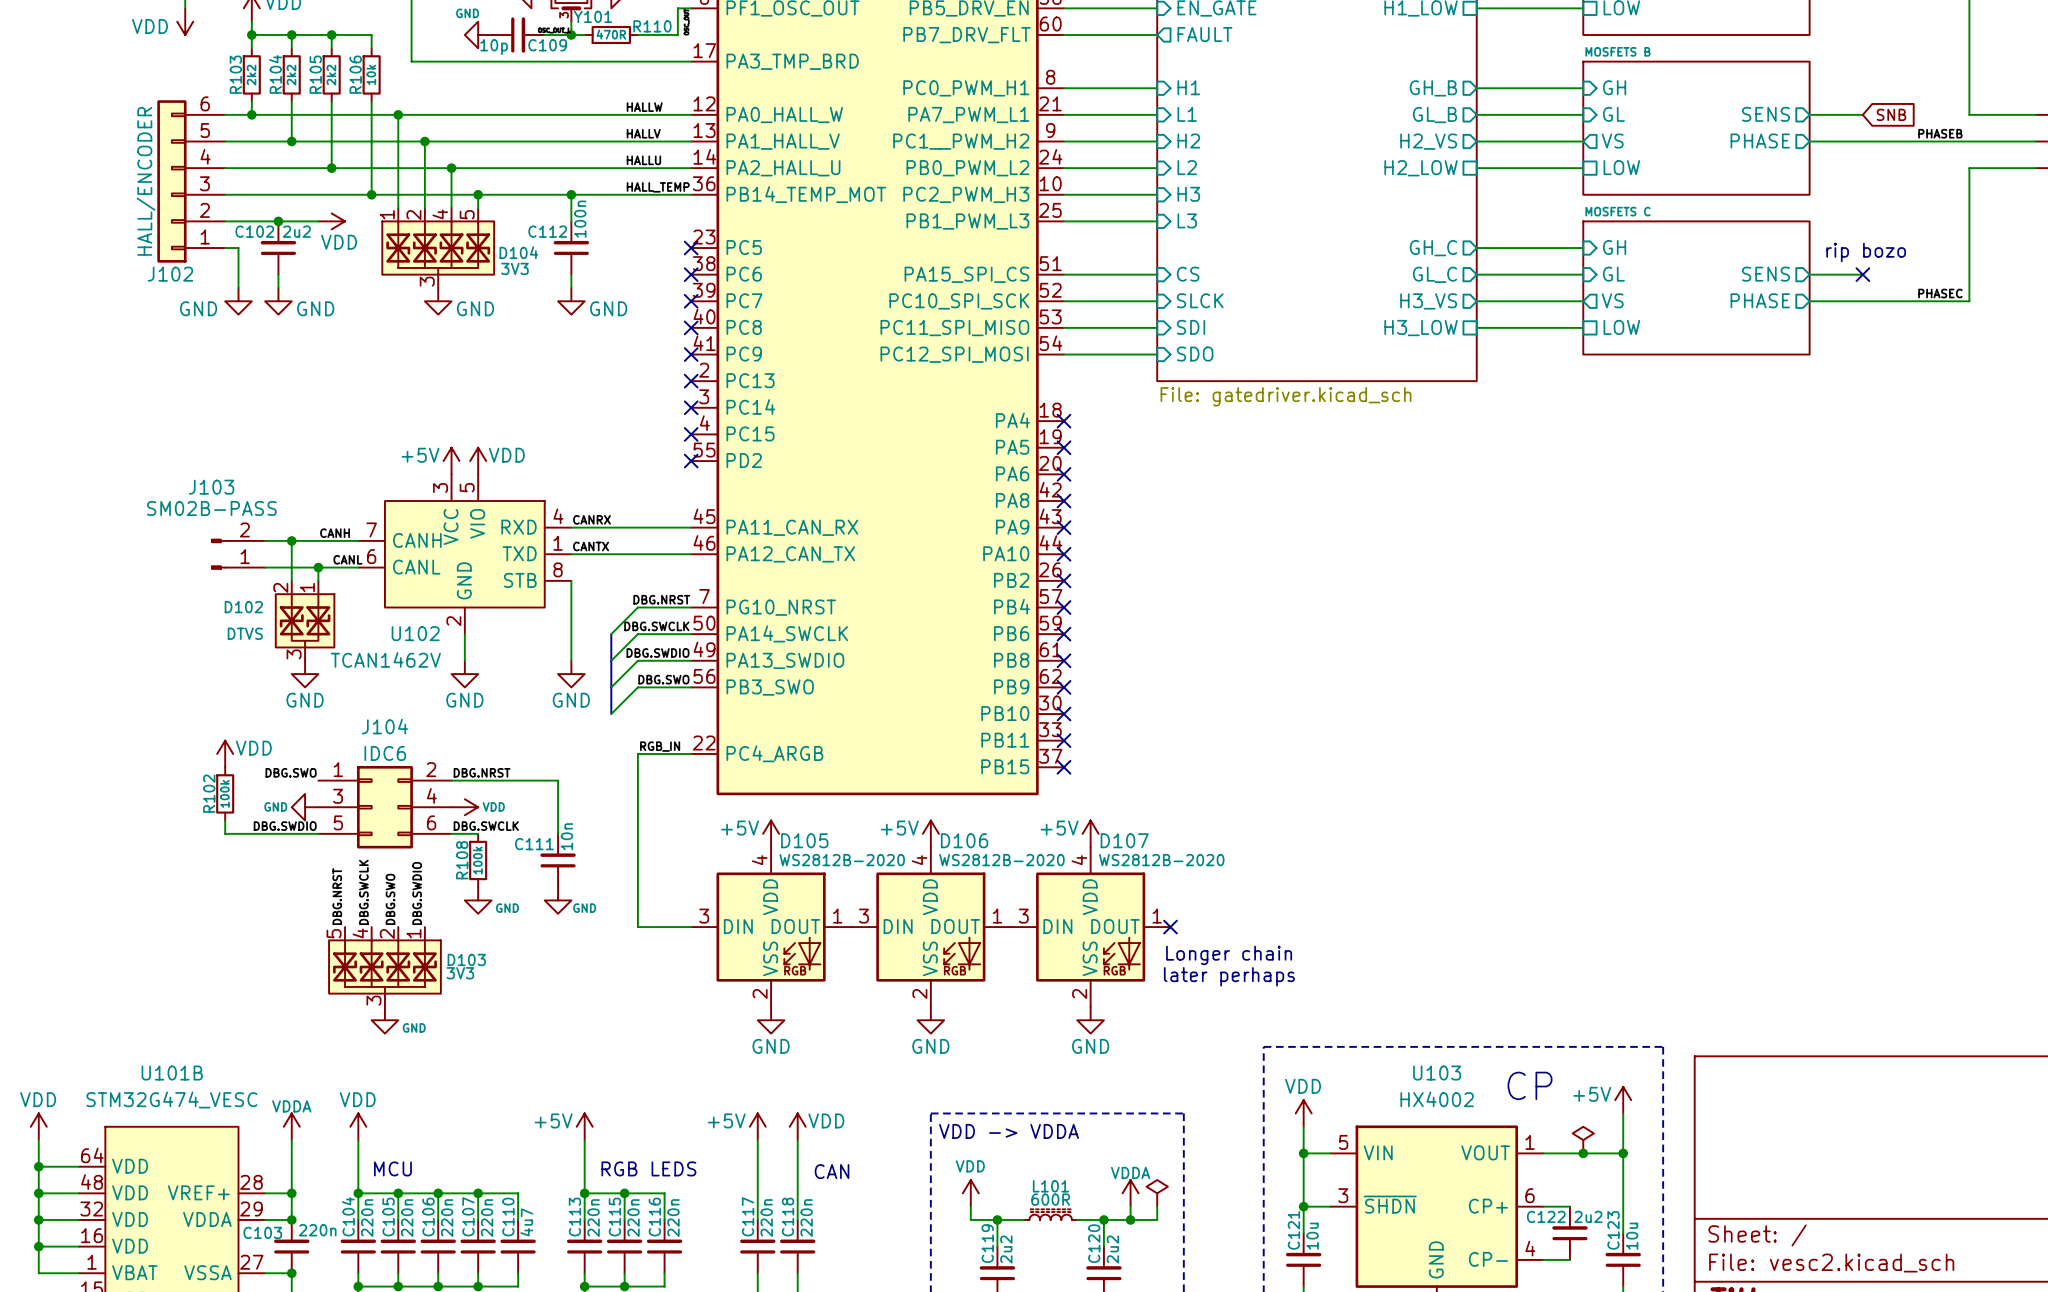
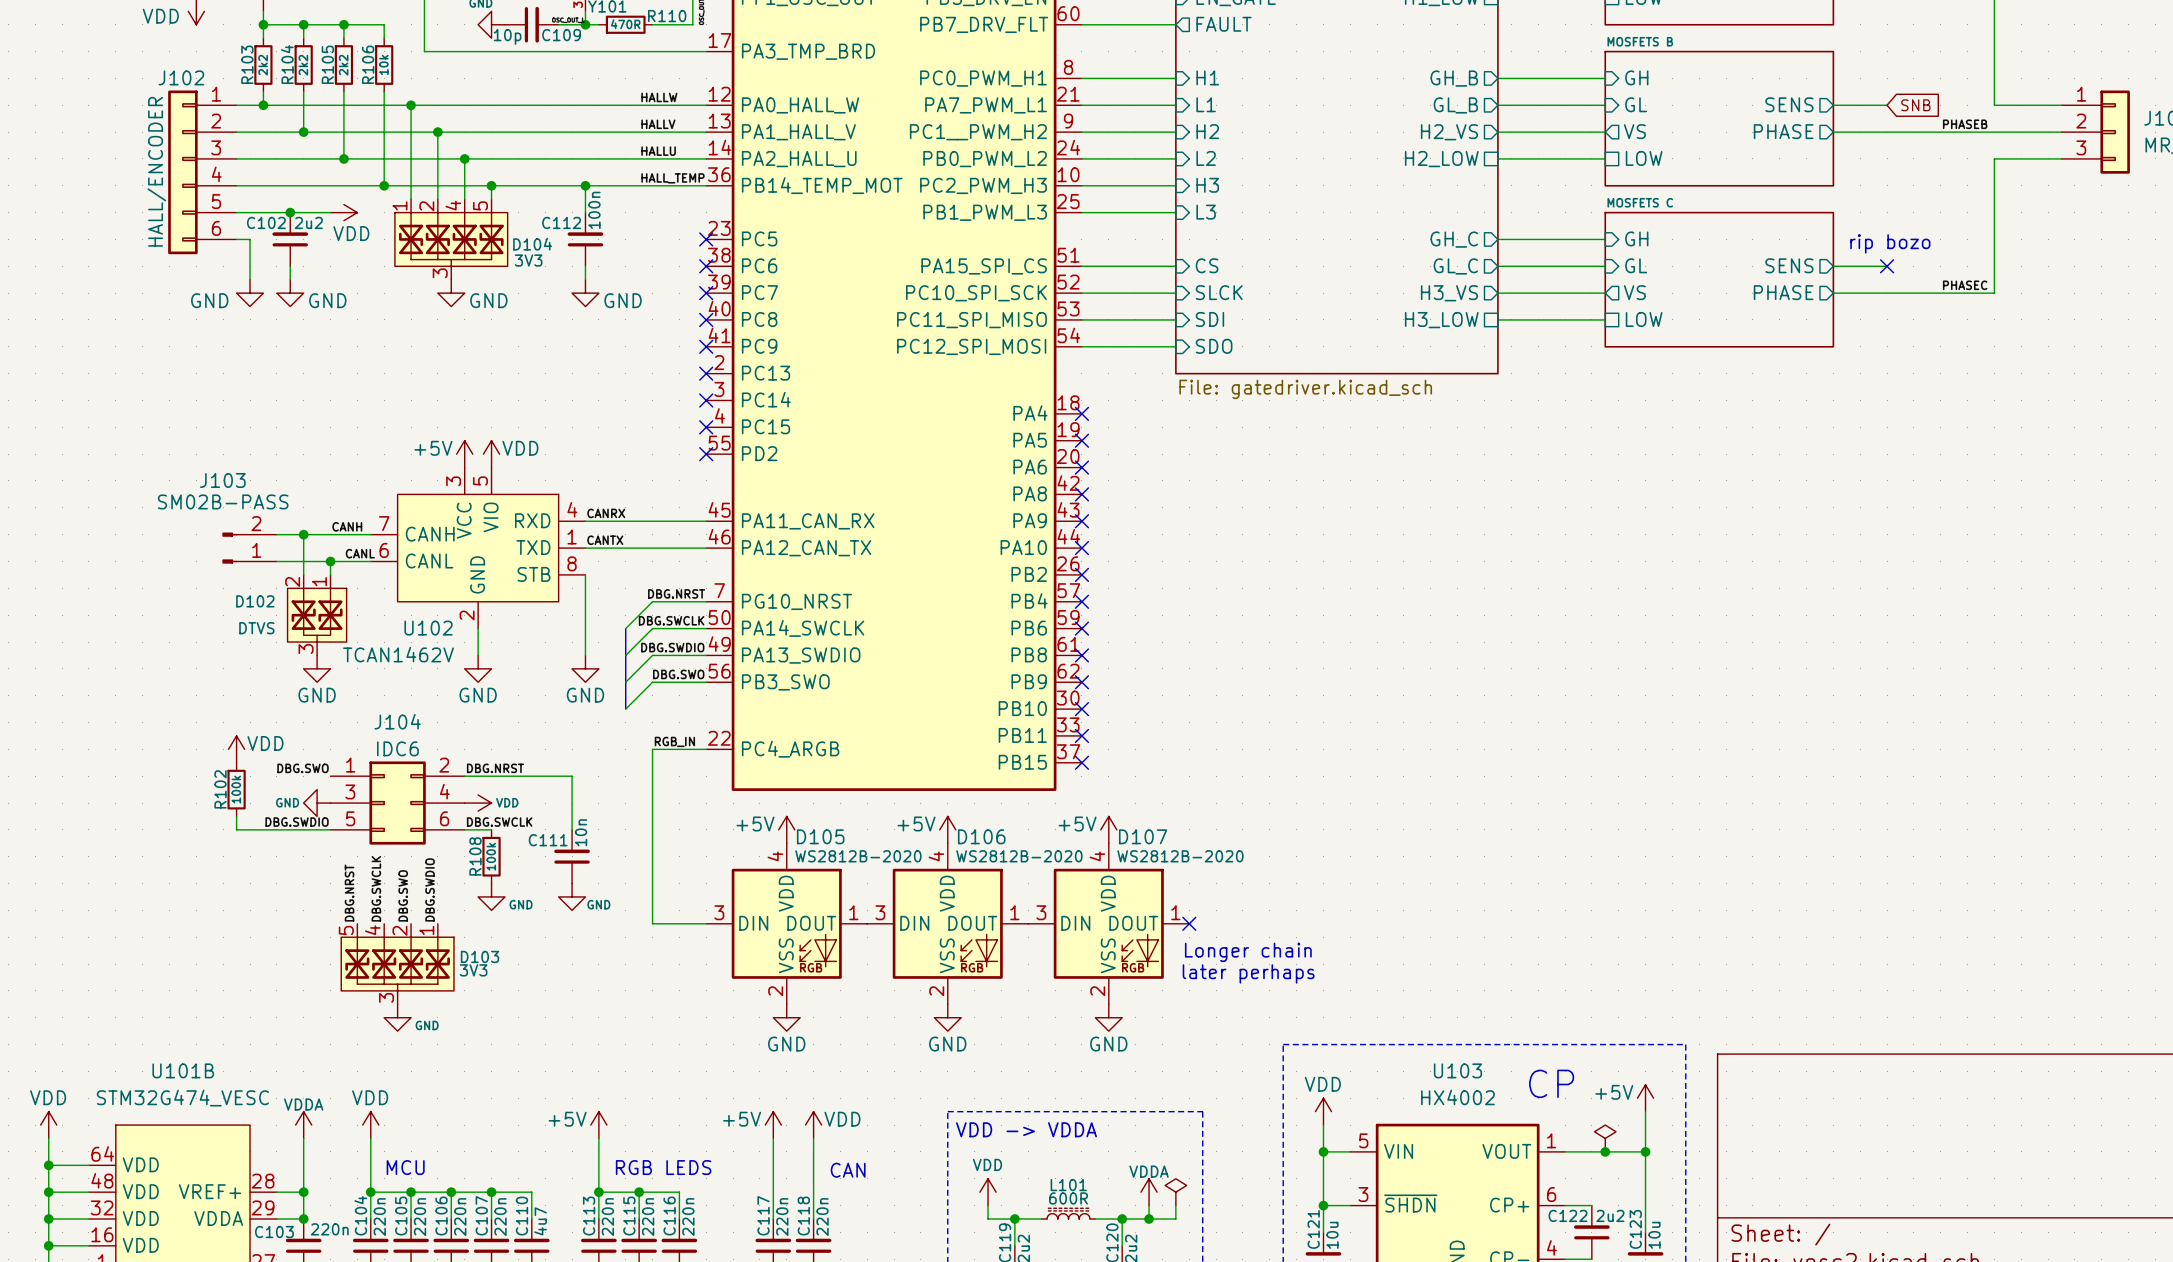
J102 flip: as is (171, 181) -> up-down (182, 172)

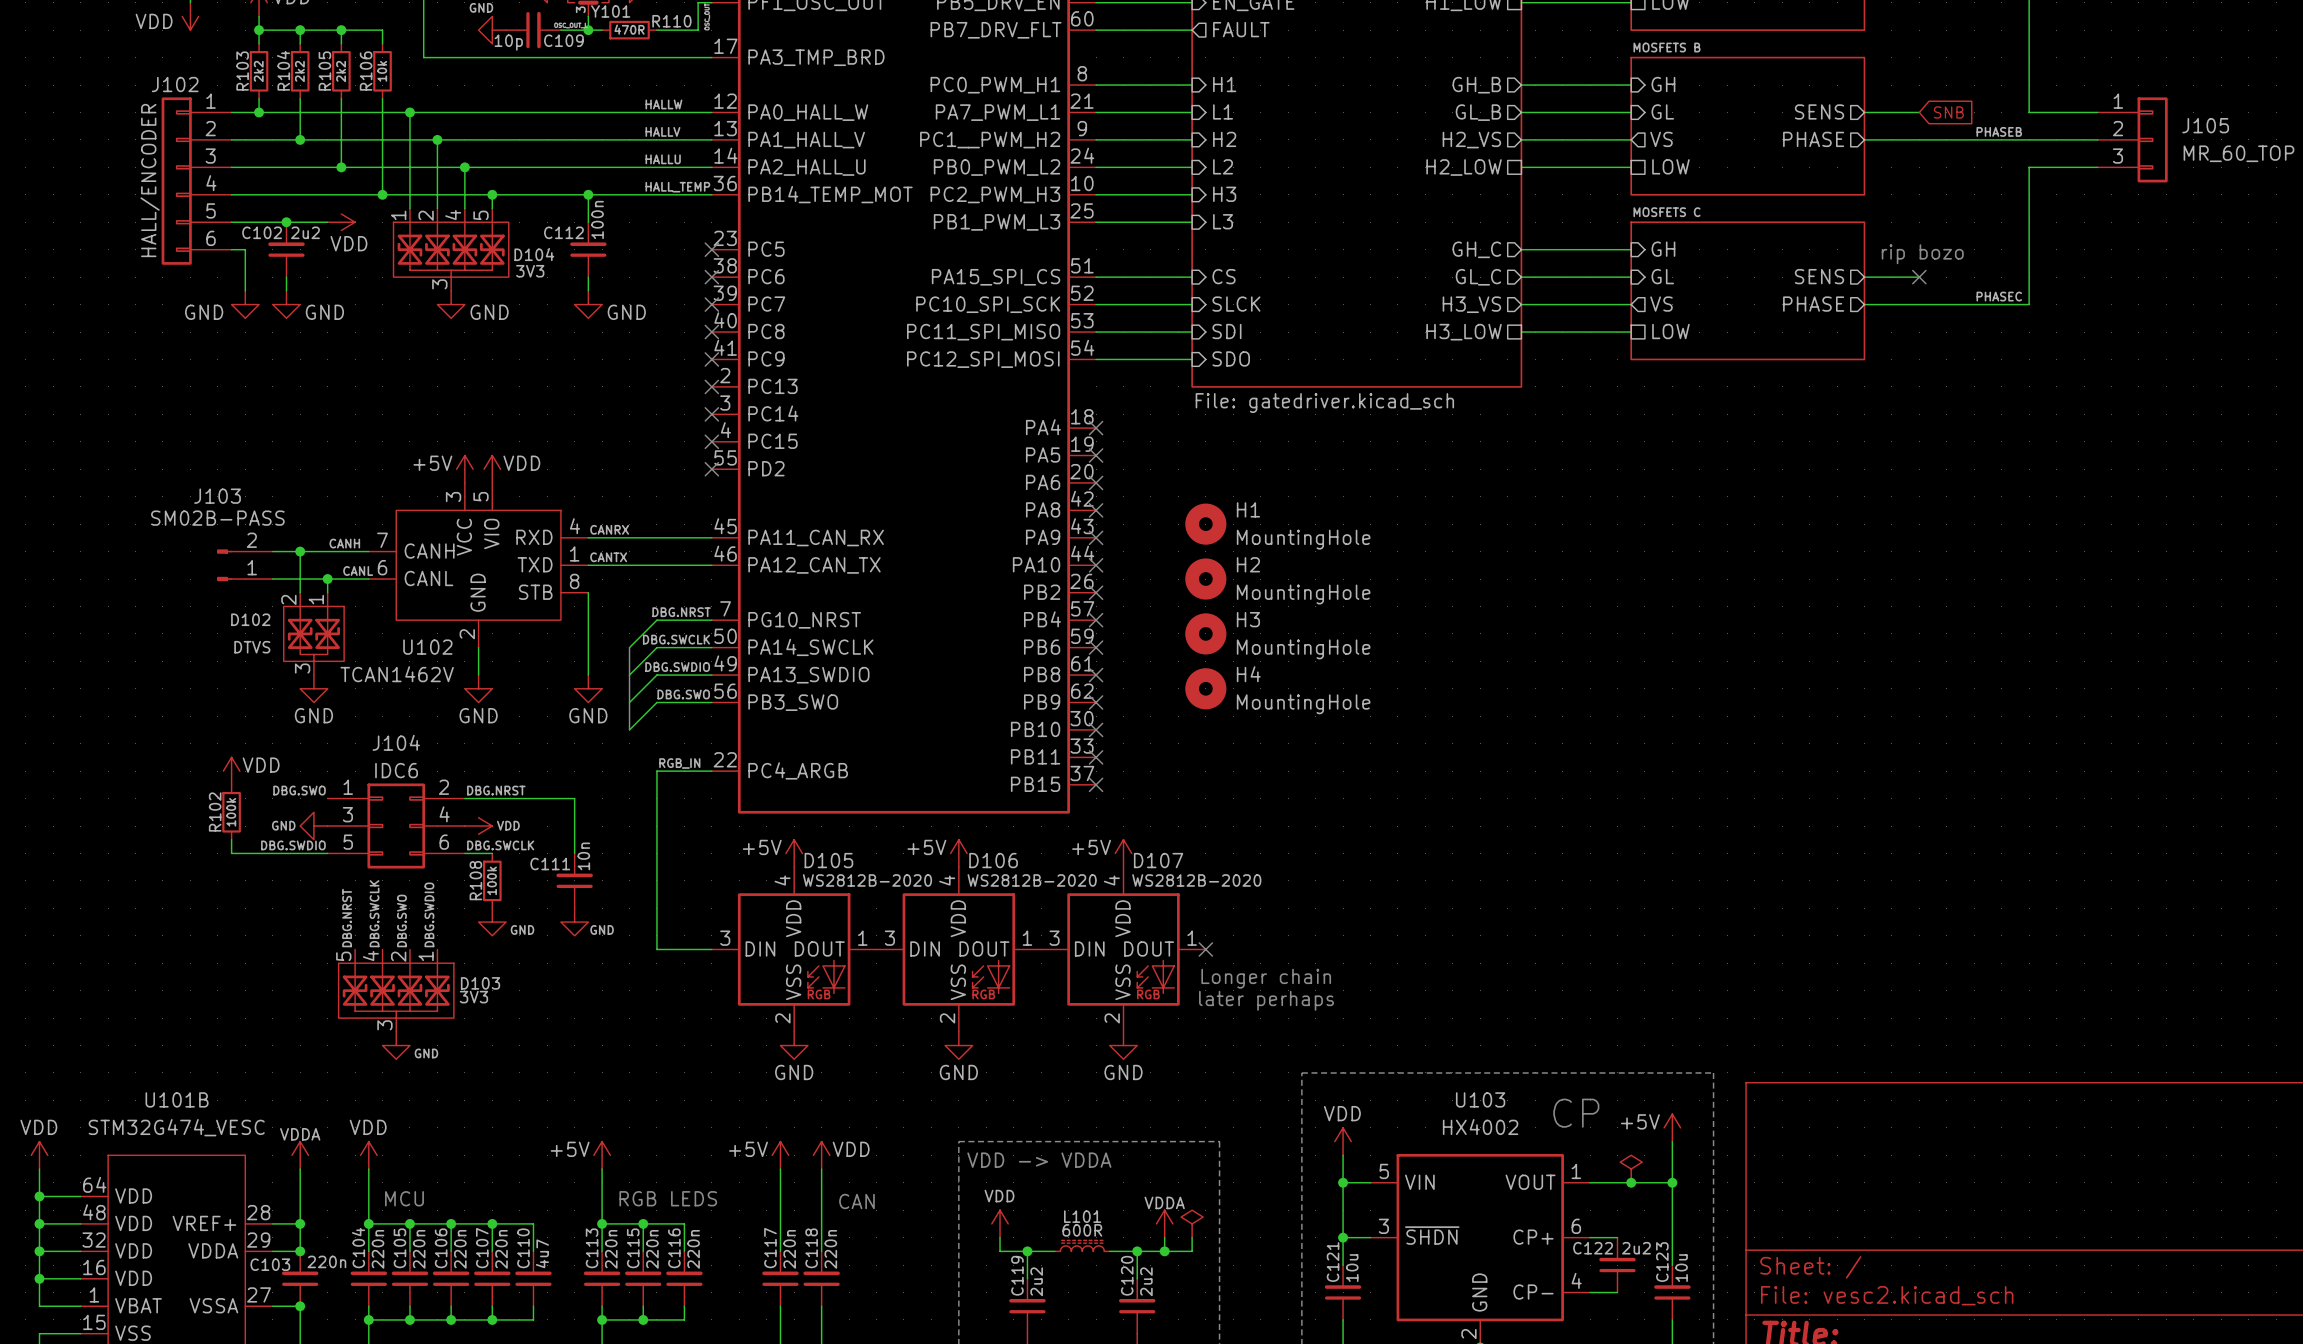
H1: none -> MountingHole (1205, 524)
H2: none -> MountingHole (1205, 579)
H3: none -> MountingHole (1205, 633)
H4: none -> MountingHole (1205, 688)

